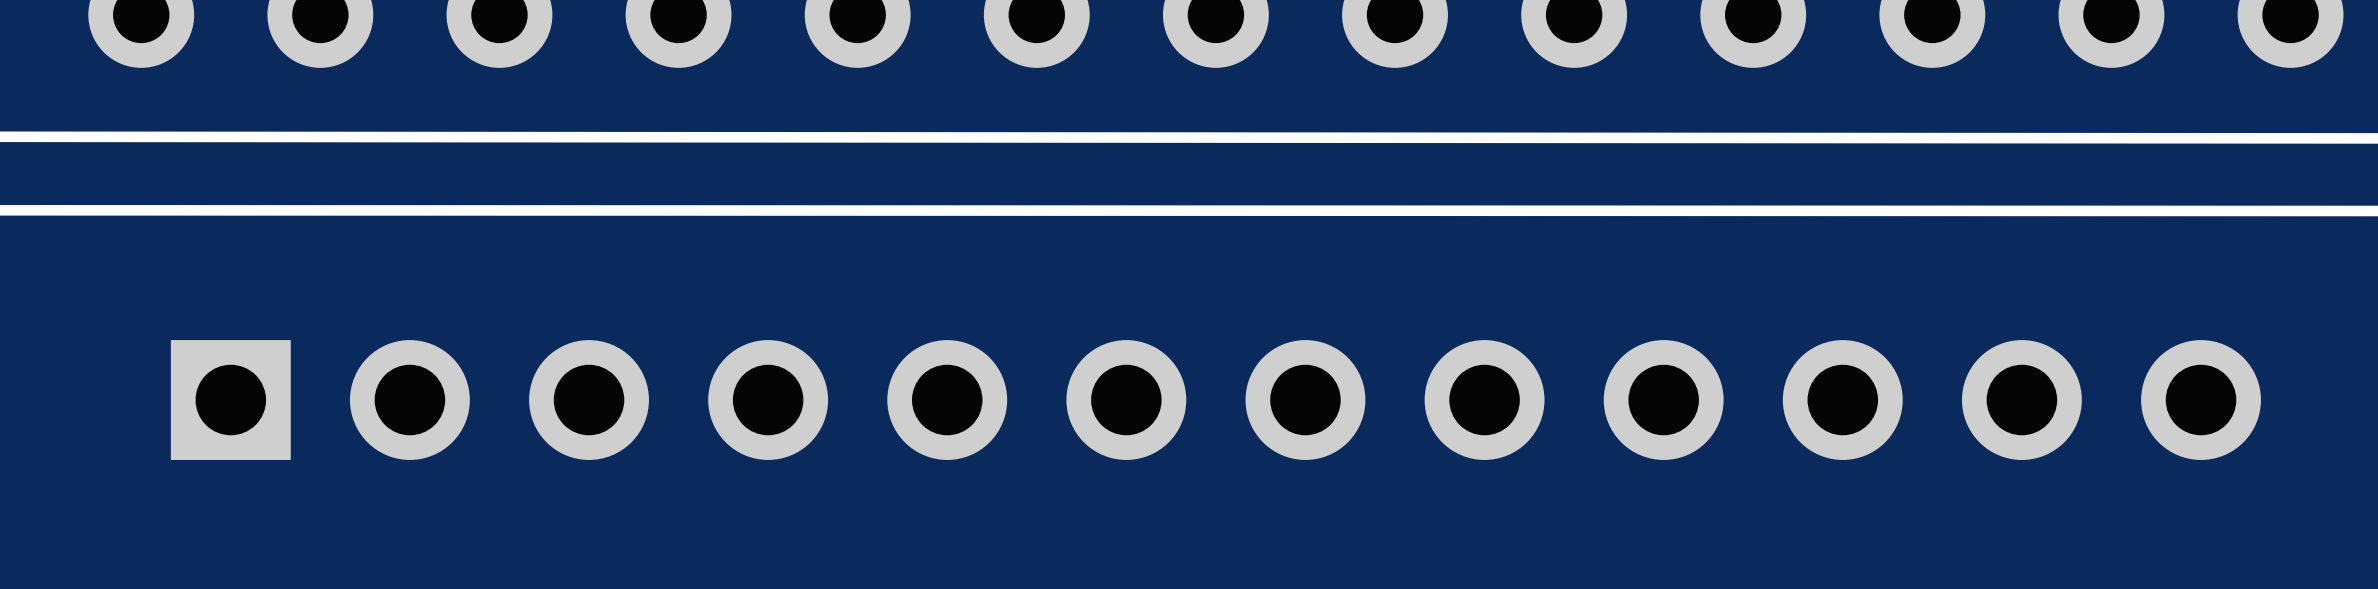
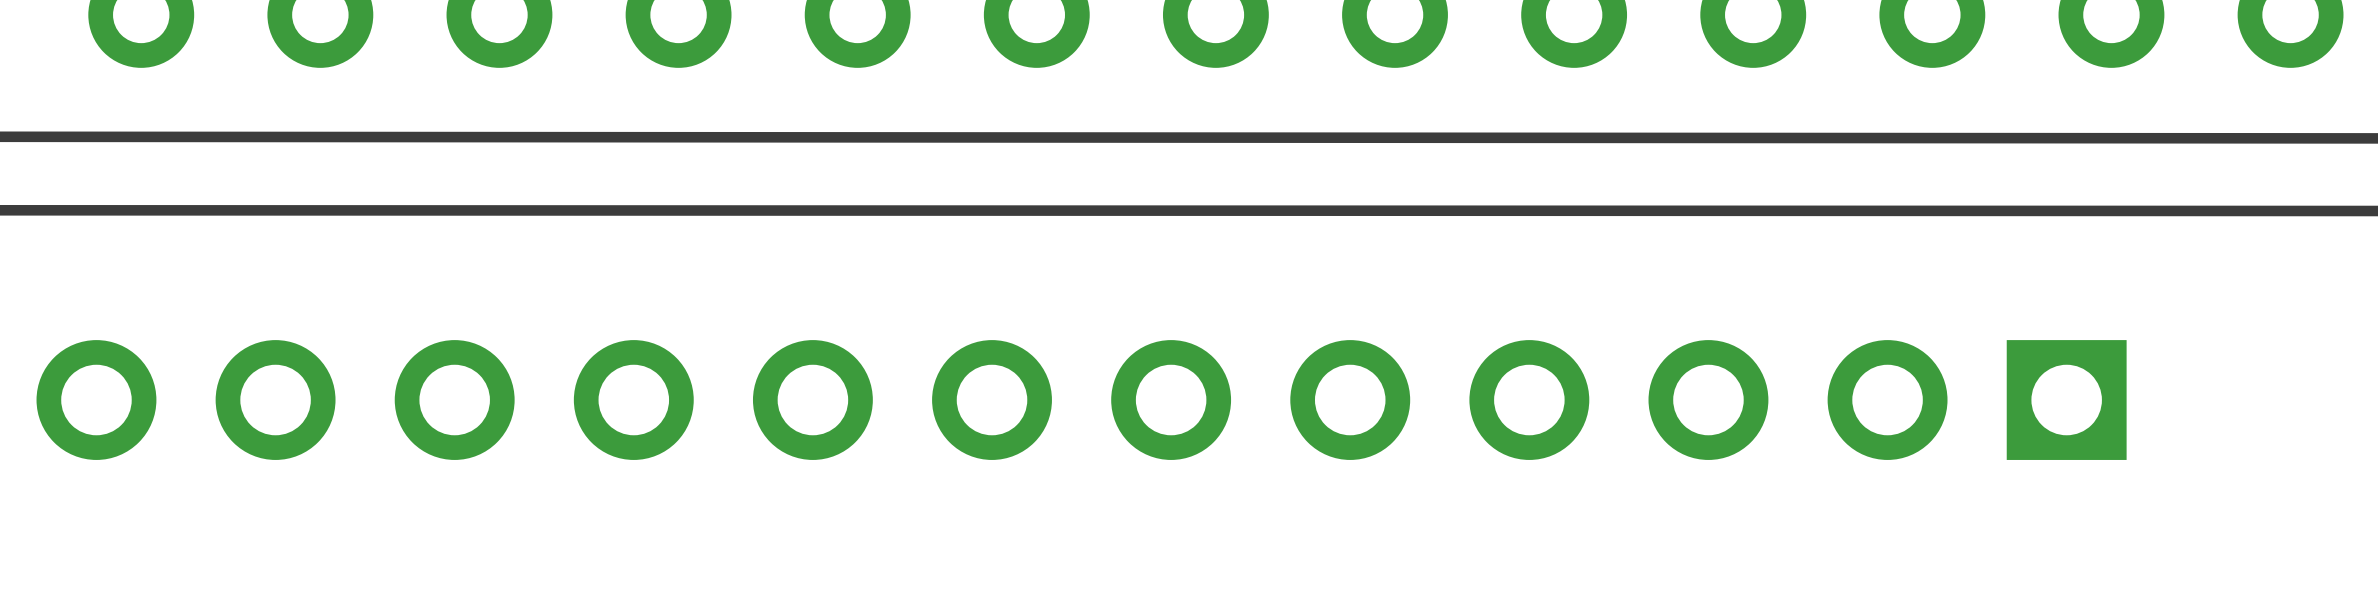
part rotation: 0° (1215, 400) -> 180° (1081, 400)

